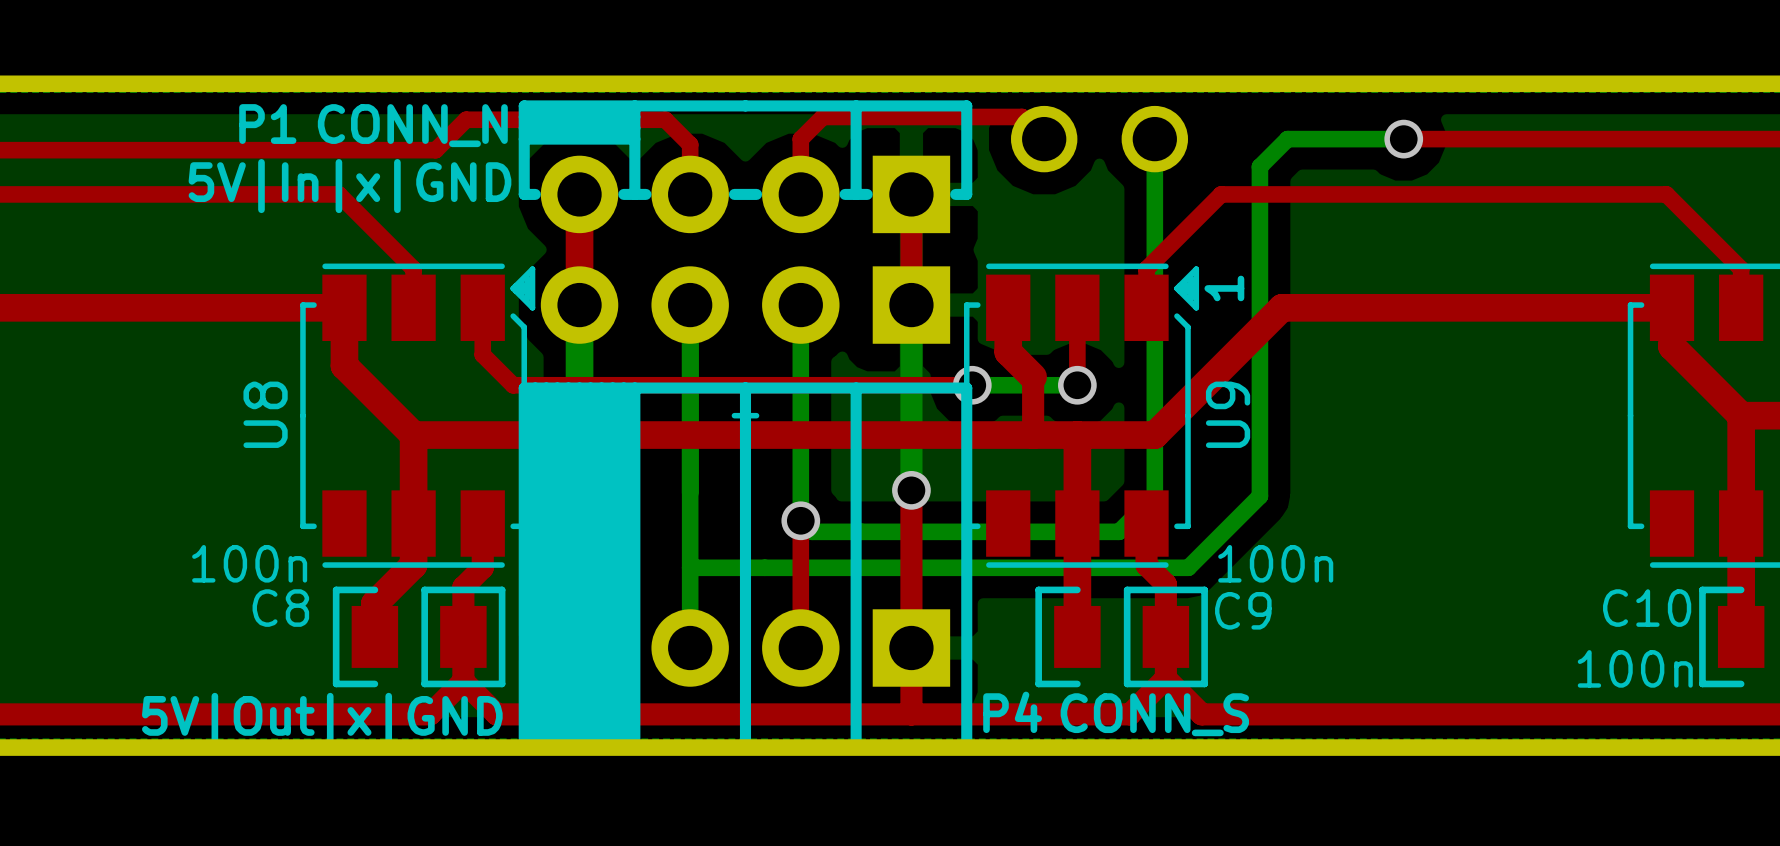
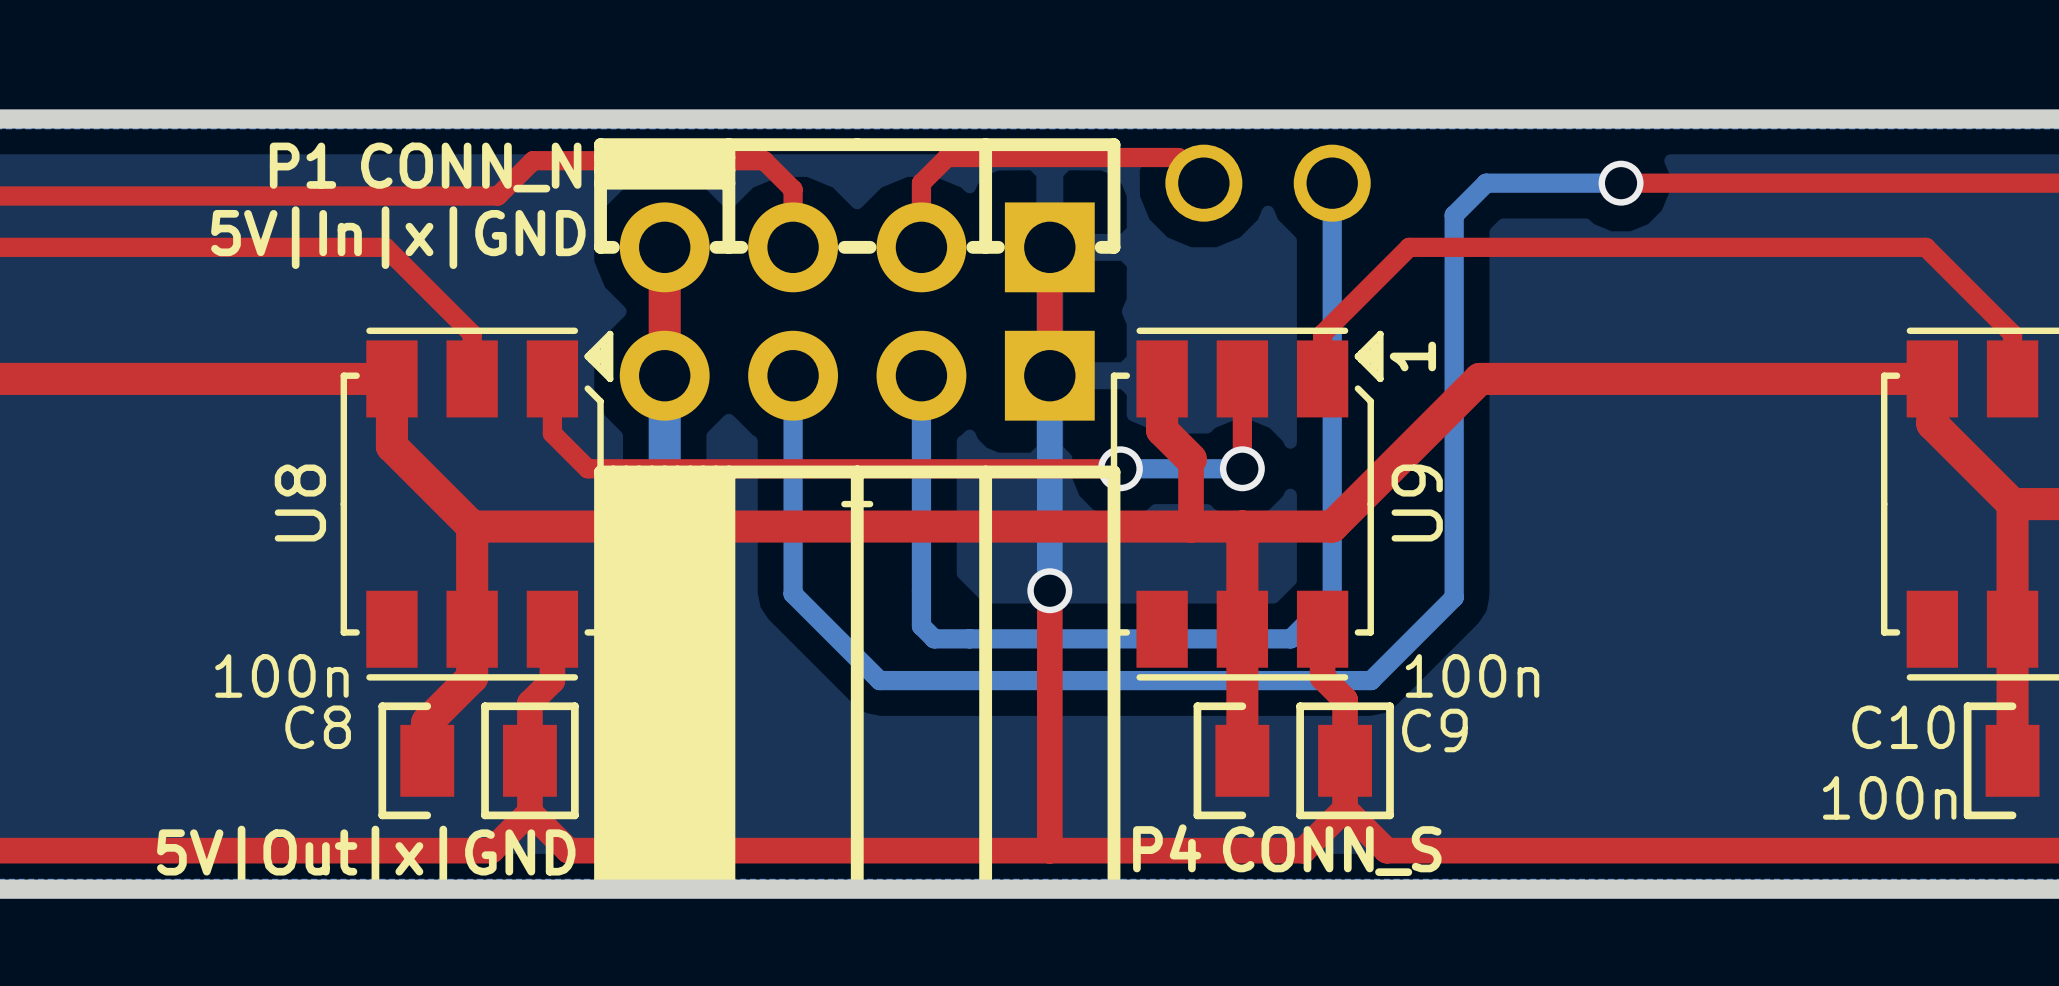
P4 footprint: [518, 266, 973, 754] -> [594, 330, 1121, 896]
bottom track: (690, 493) (690, 648) -> none
top track: (800, 520) (800, 648) -> none
via: (800, 520) -> none
bottom track: (690, 567) (764, 567) -> (793, 593) (879, 680)

